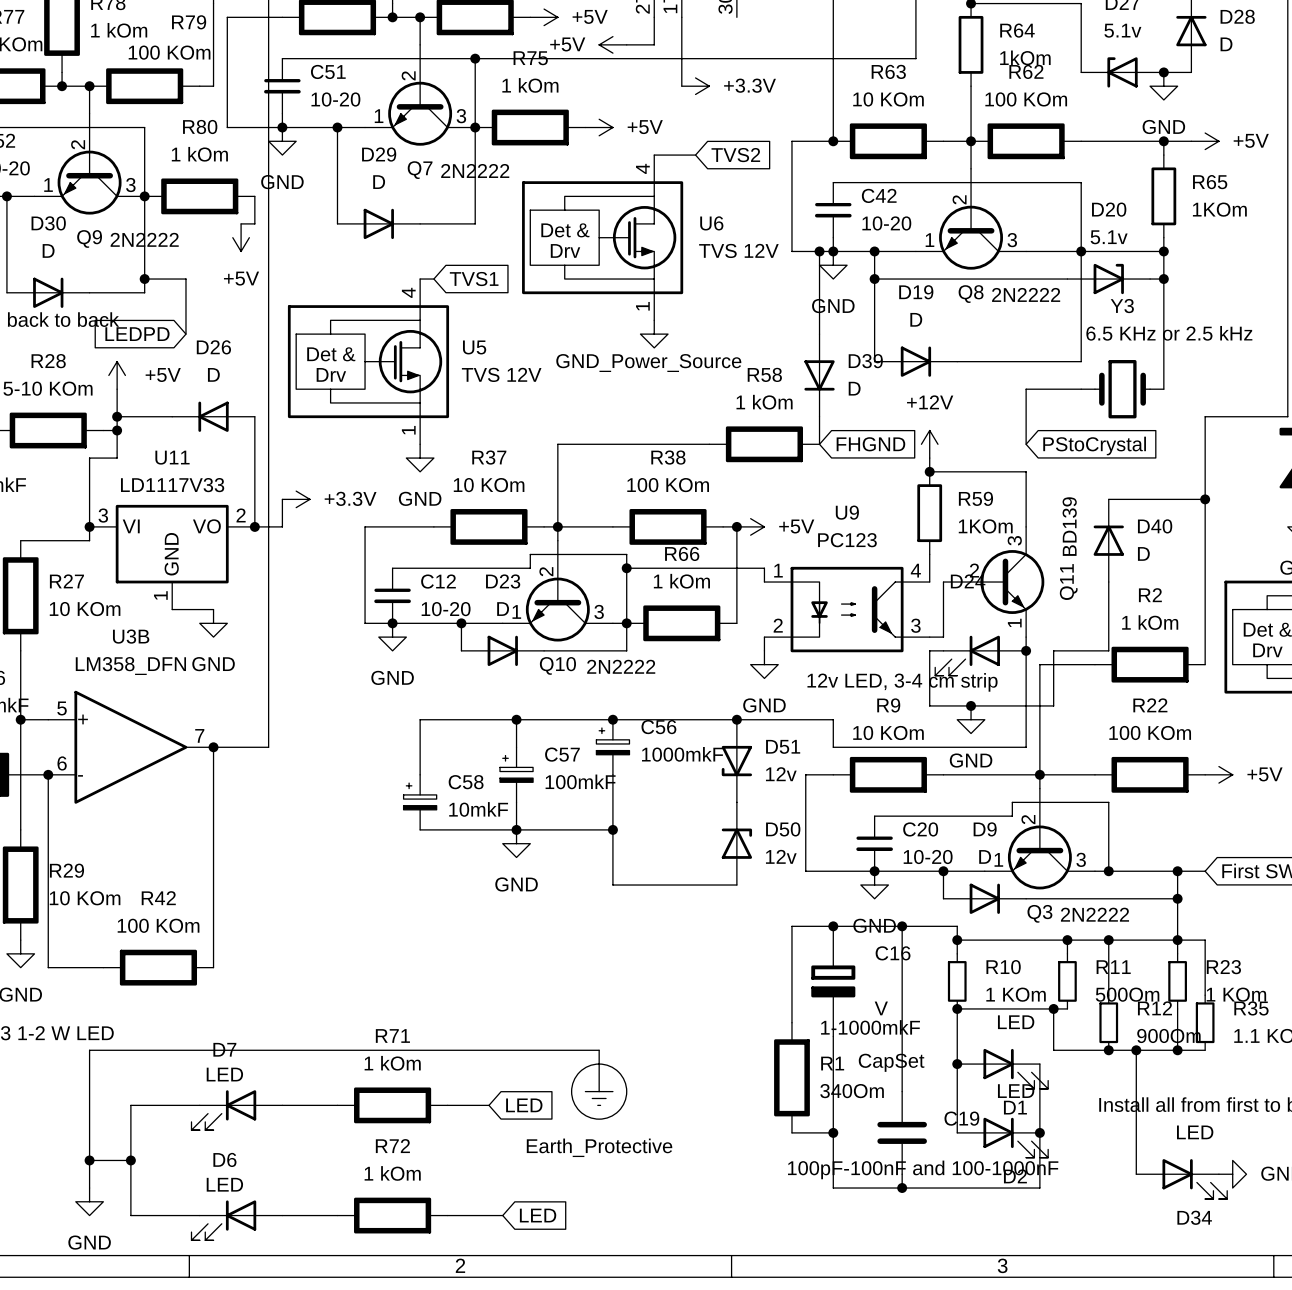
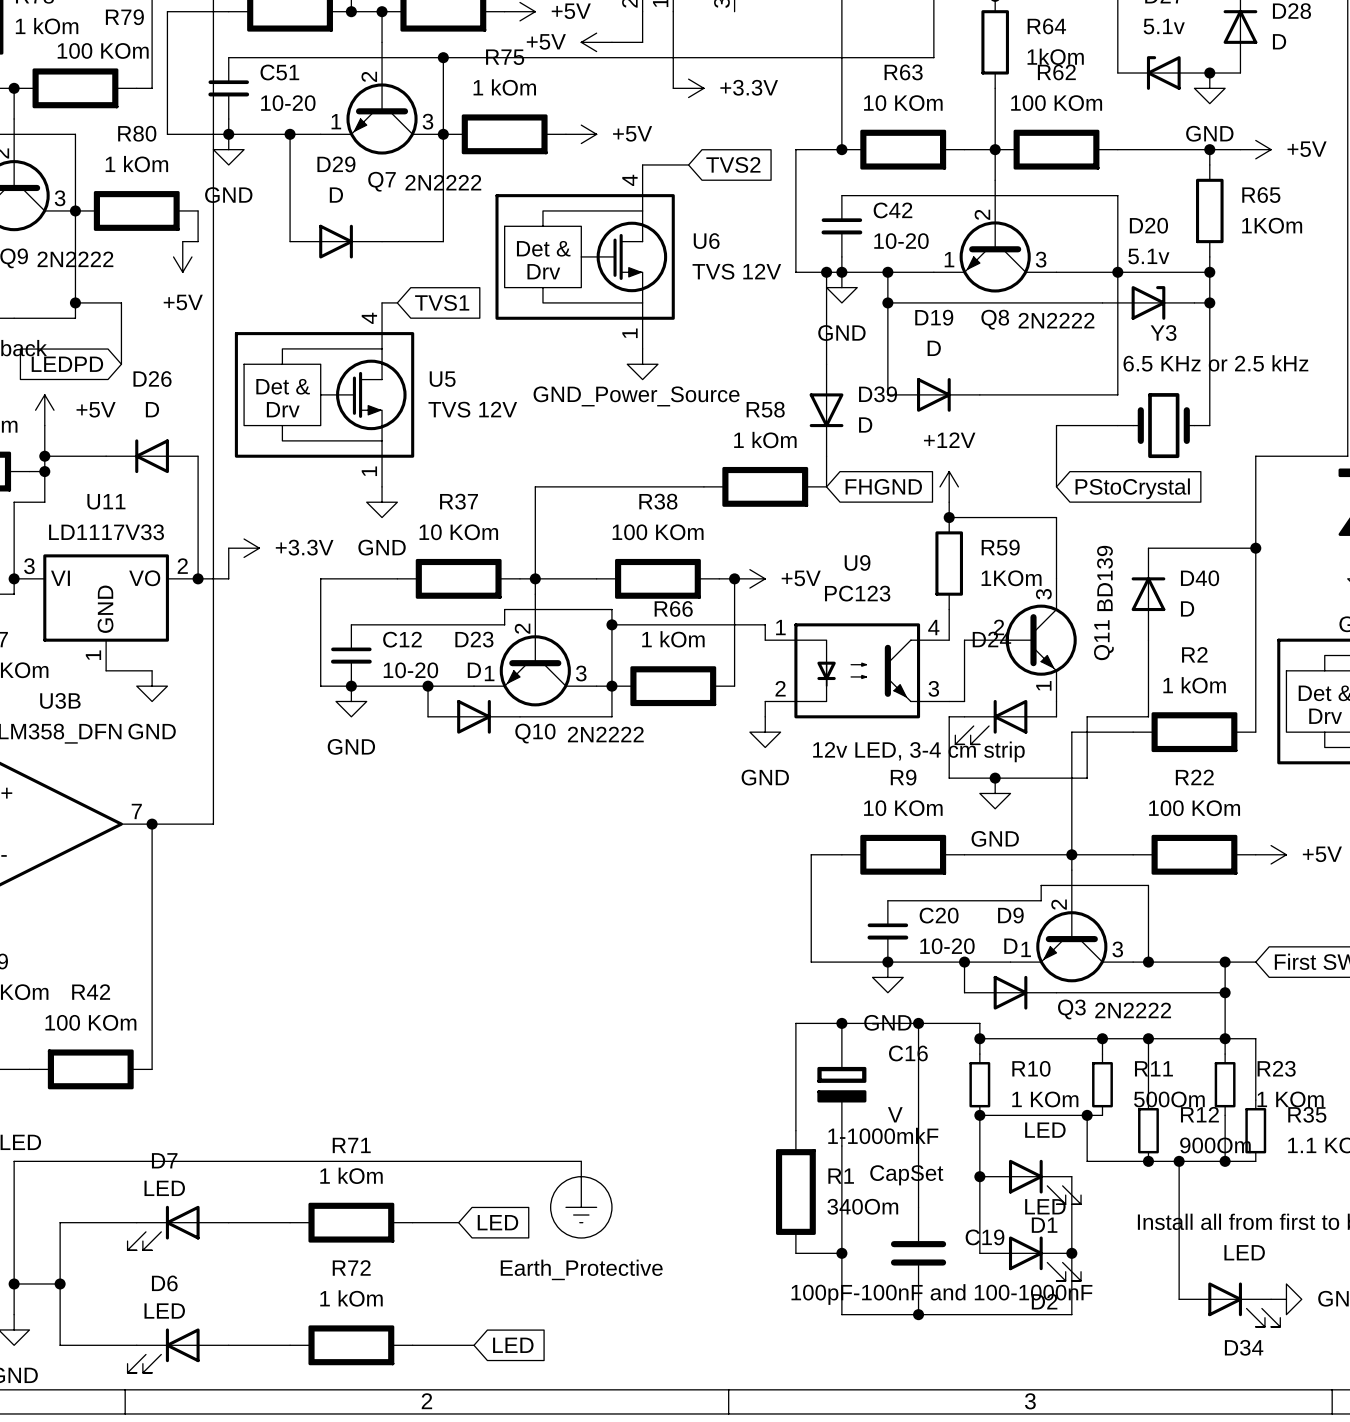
wire: (1026, 650) (1026, 747) (833, 747) (833, 719) (420, 719) (420, 774) -> none
junction: (1026, 650) -> none
wire: (516, 719) (516, 747) -> none
junction: (516, 719) -> none
junction: (612, 719) -> none
junction: (736, 719) -> none
C56: 1000mkF (612, 747) -> none
D51: 12v (736, 761) -> none
C57: 100mkF (516, 774) -> none
wire: (612, 774) (612, 885) (736, 885) -> none
C58: 10mkF (420, 802) -> none
wire: (516, 802) (516, 829) -> none
wire: (420, 829) (612, 829) -> none
junction: (516, 829) -> none
junction: (612, 829) -> none
power symbol: GND (516, 843) -> none
D50: 12v (736, 843) -> none

